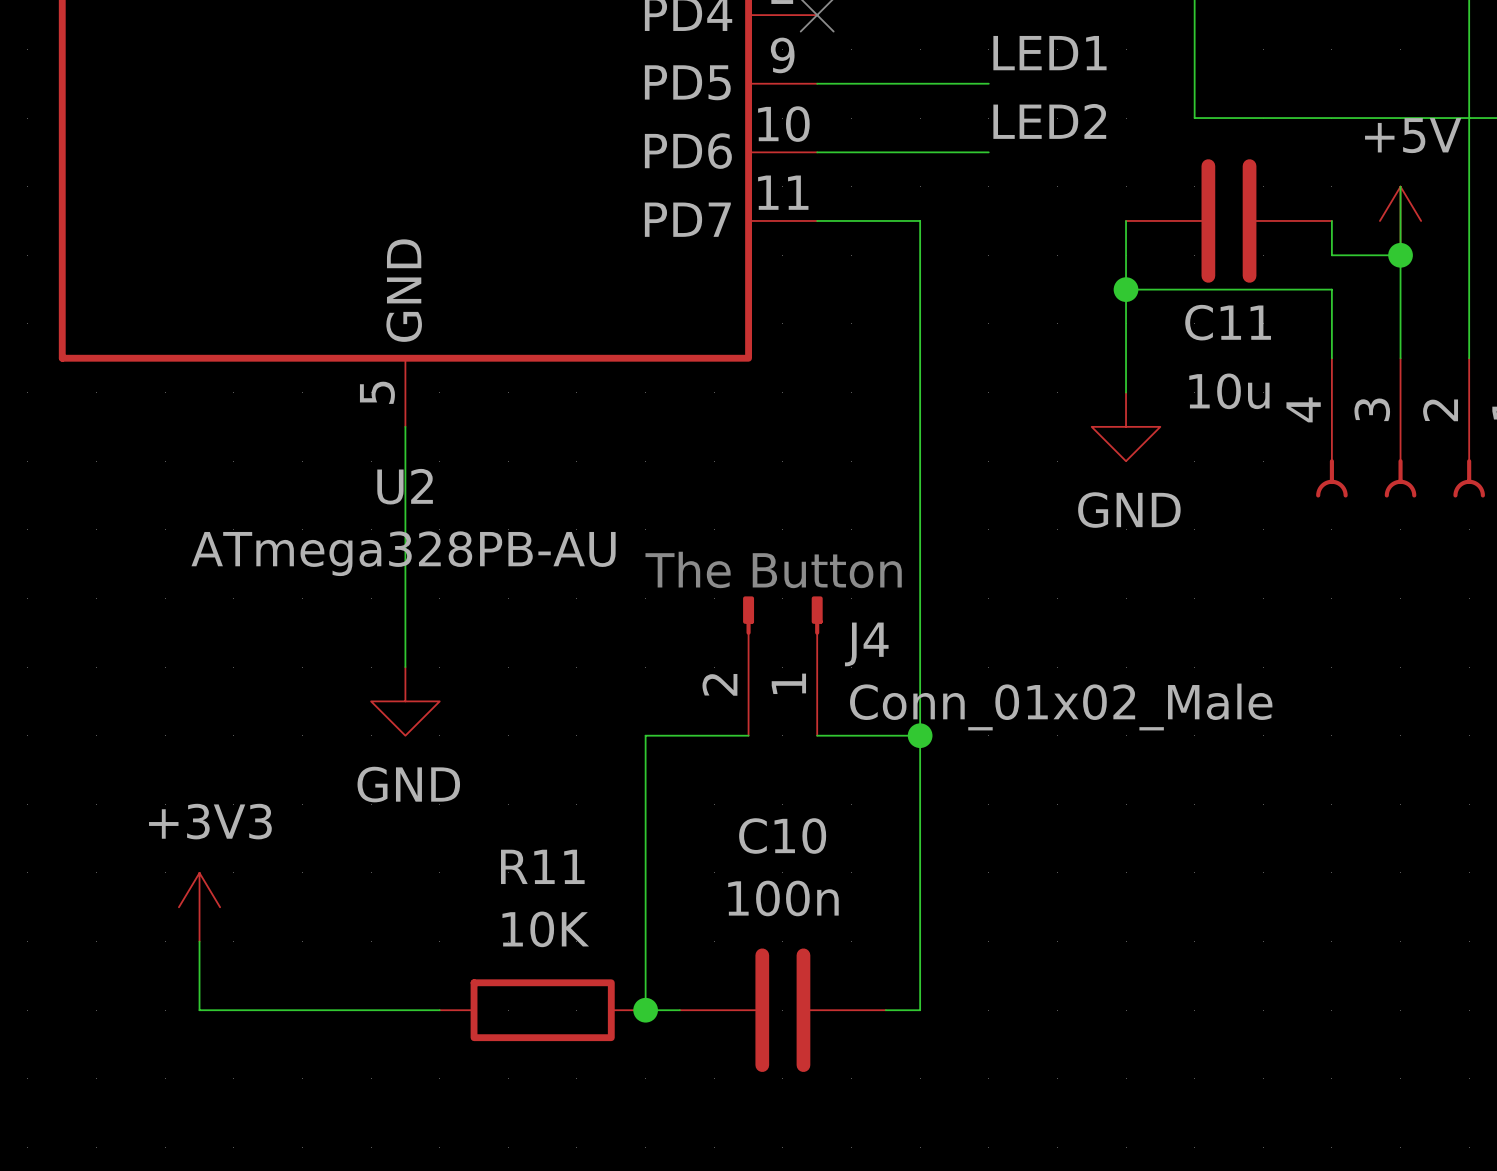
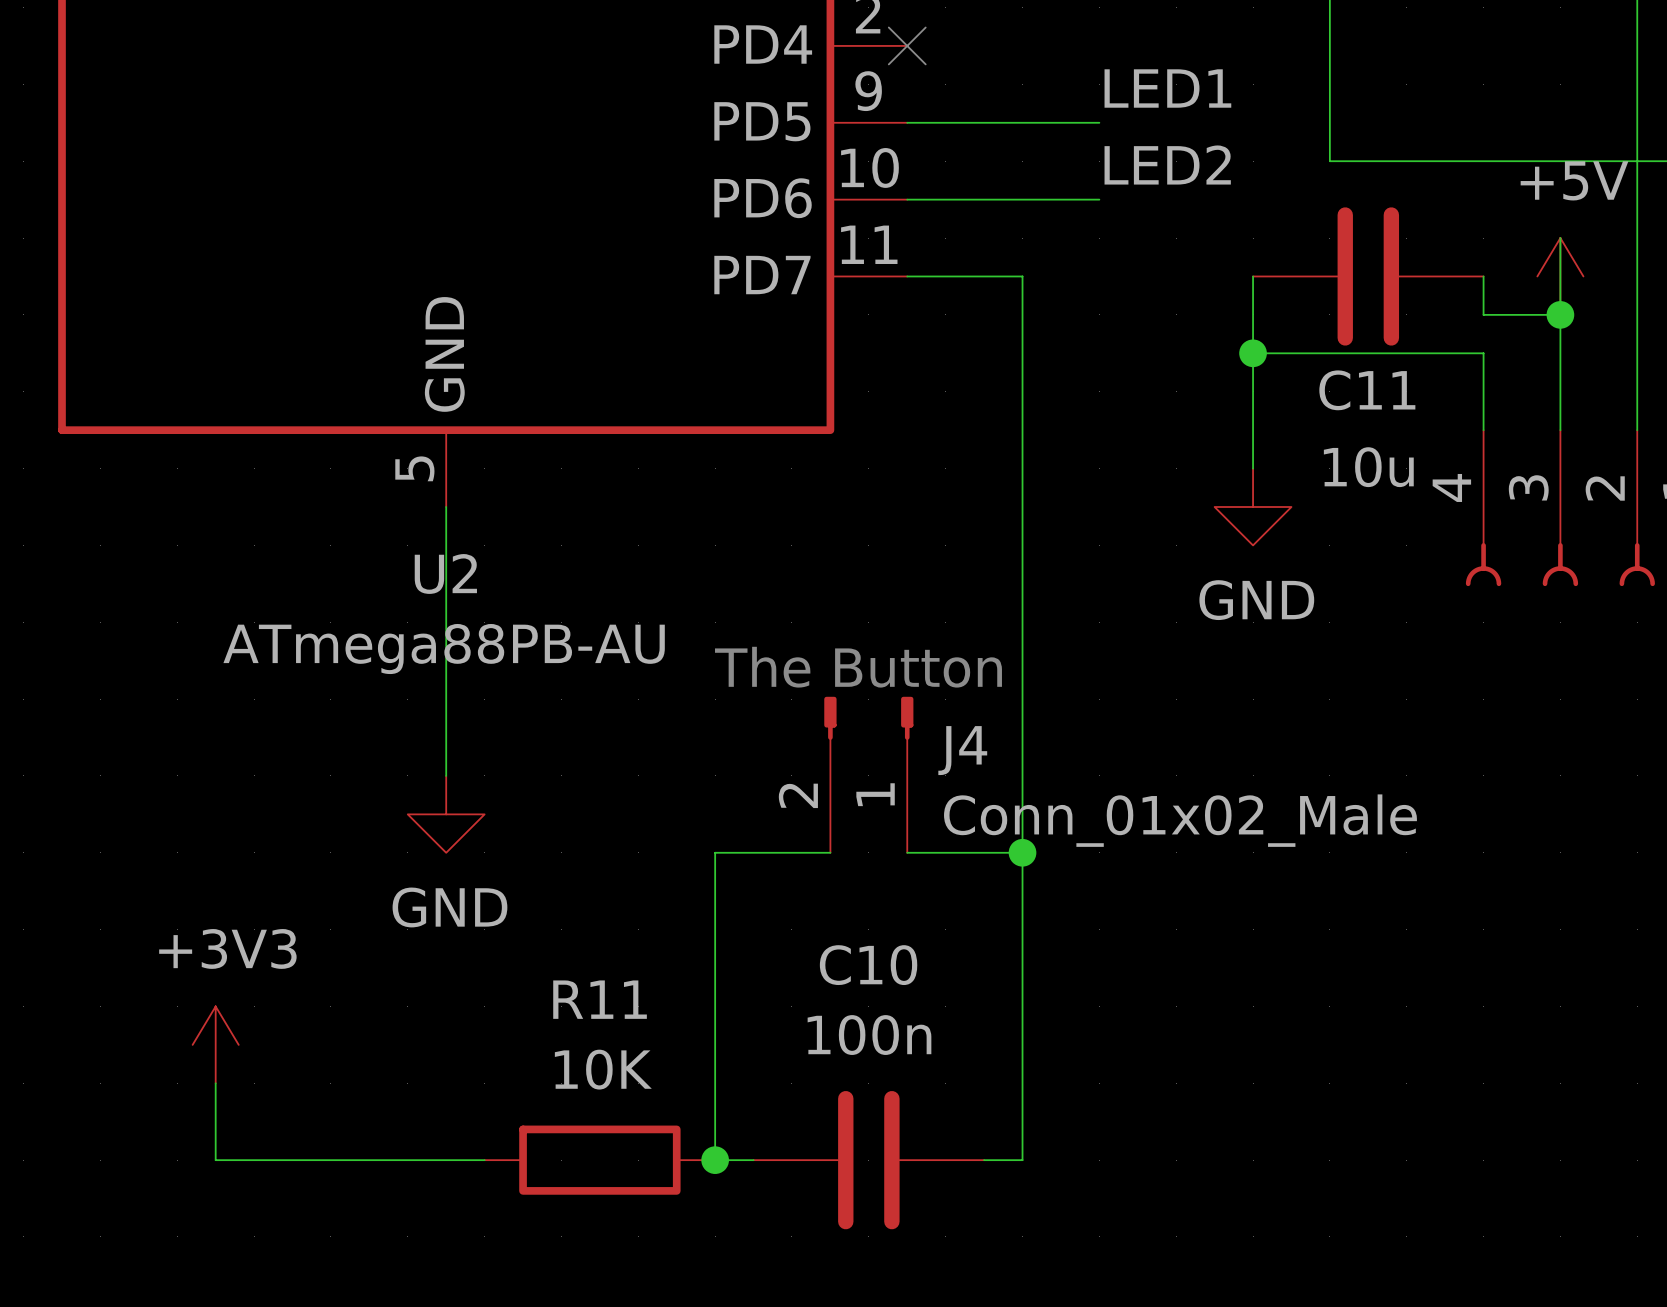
U2 value: ATmega328PB-AU (403, 553) -> ATmega88PB-AU (444, 649)

